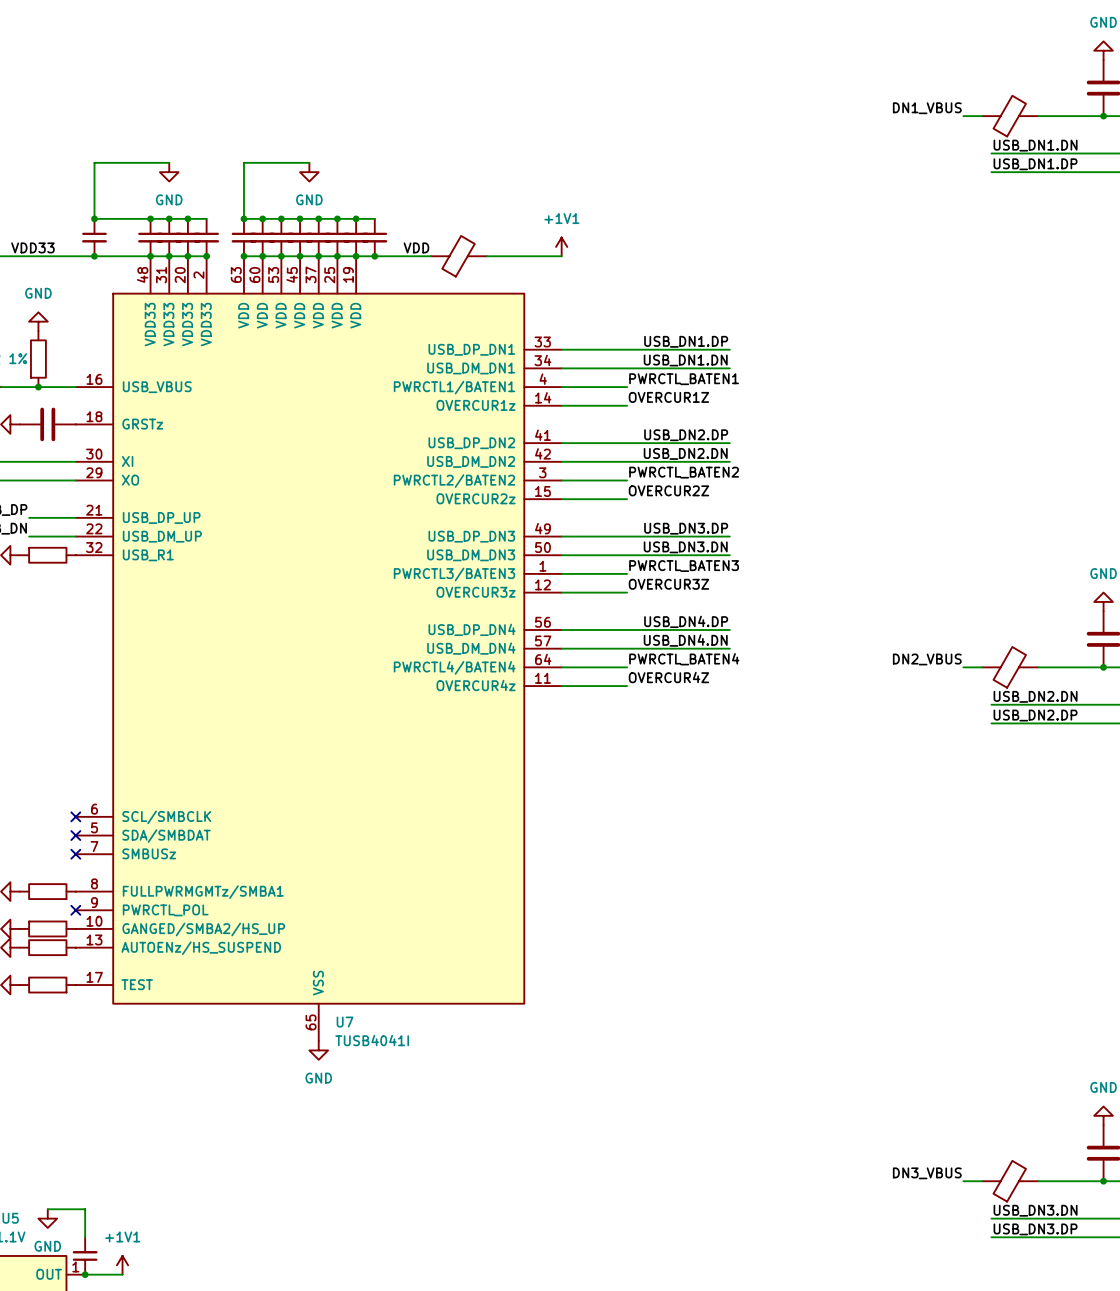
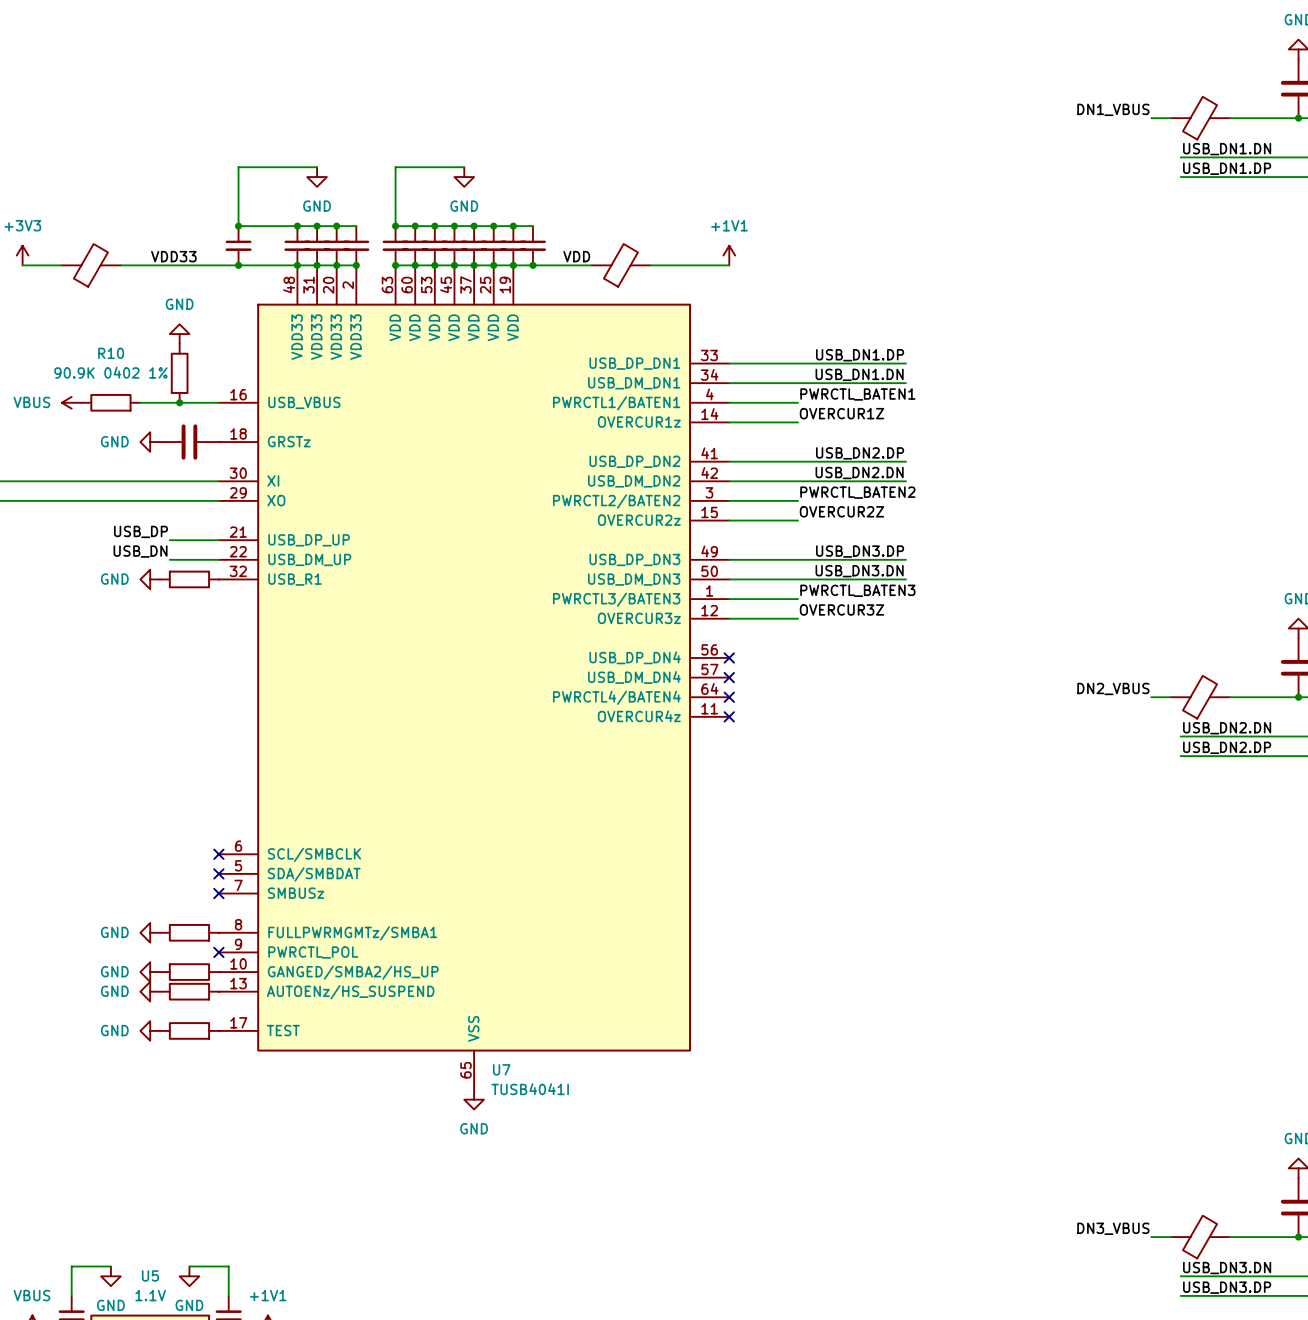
label: USB_DN4.DP (686, 621) -> none
wire: (561, 629) (729, 629) -> none
no-connect mark: none -> (729, 657)
label: USB_DN4.DN (685, 640) -> none
wire: (561, 648) (729, 648) -> none
no-connect mark: none -> (729, 677)
label: PWRCTL_BATEN4 (684, 659) -> none
wire: (561, 667) (627, 667) -> none
no-connect mark: none -> (729, 697)
label: OVERCUR4Z (668, 677) -> none
wire: (561, 686) (627, 686) -> none
no-connect mark: none -> (729, 716)

